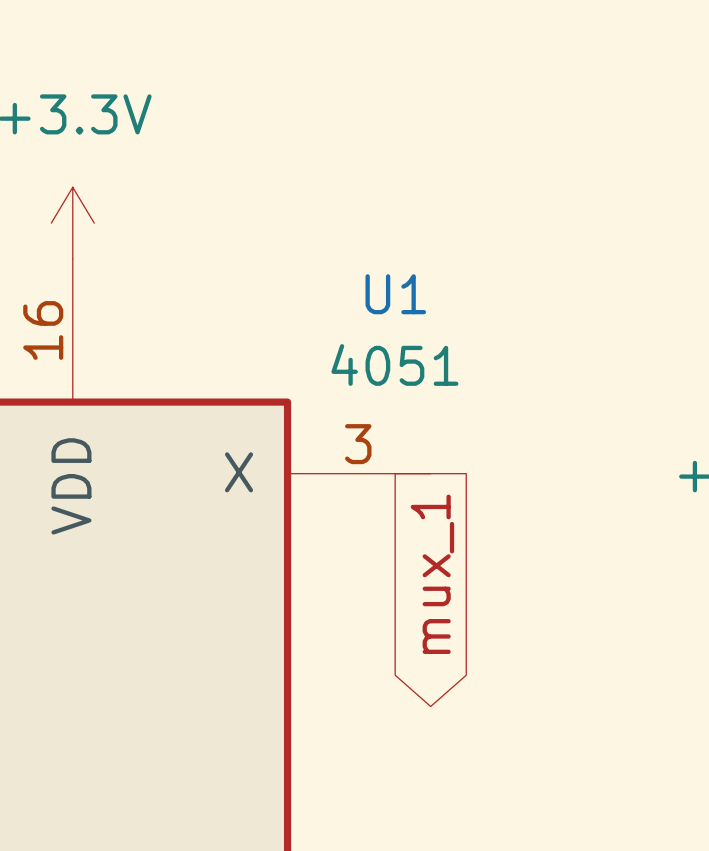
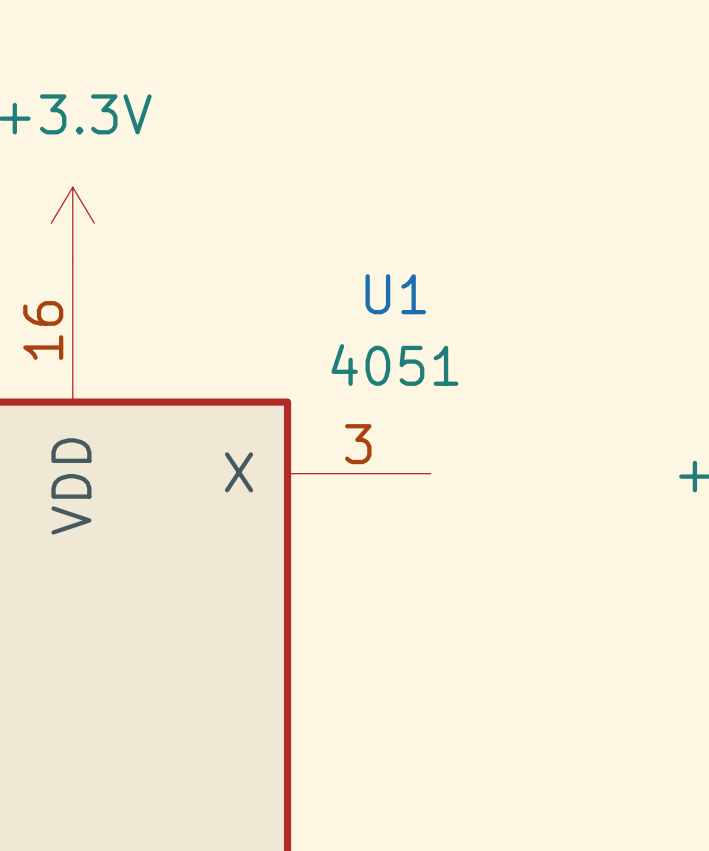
global label: mux_1 (432, 574) -> none

